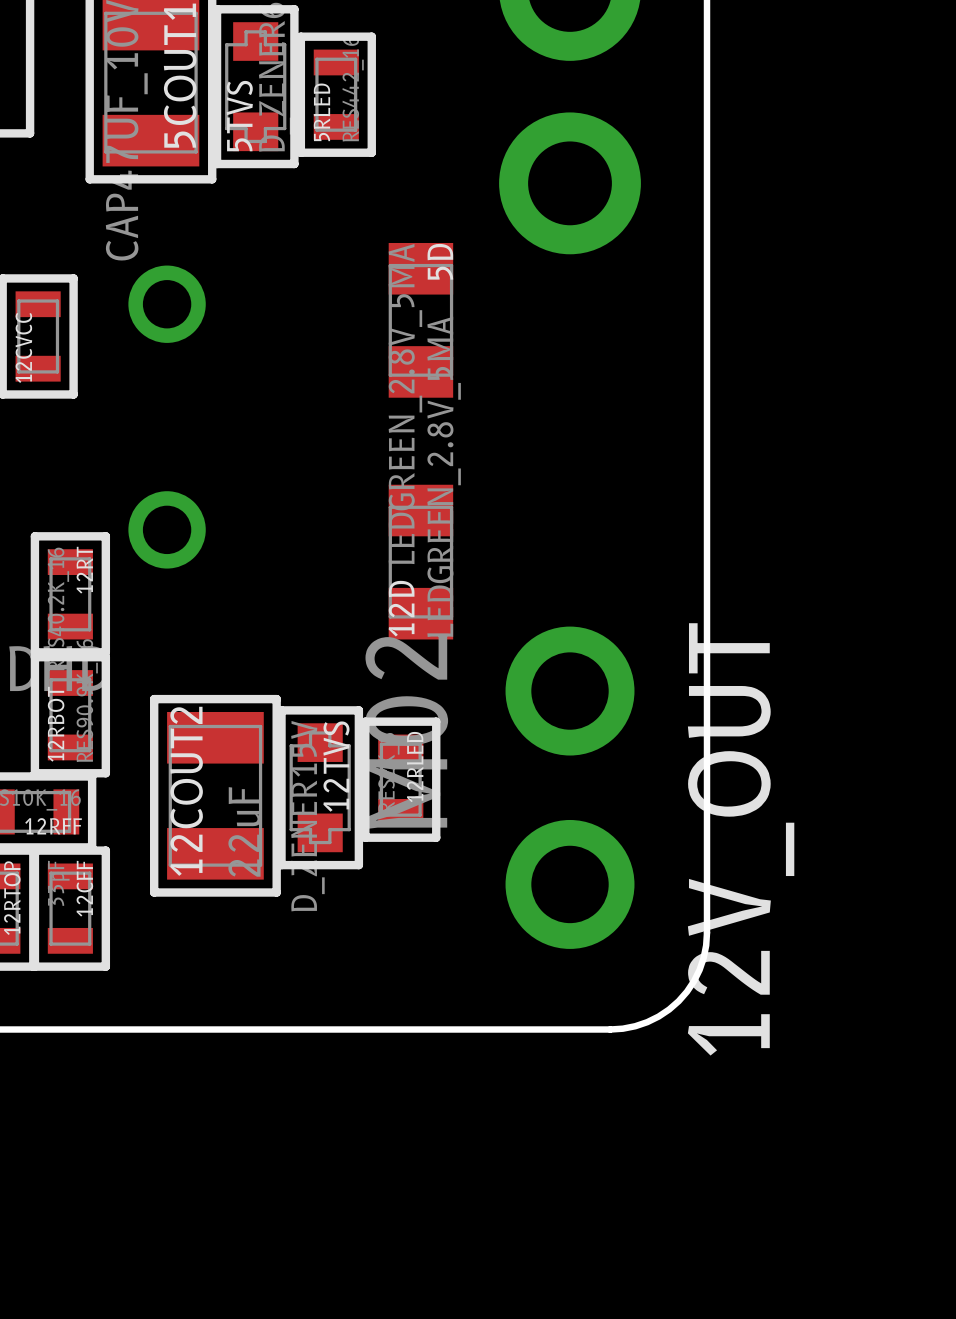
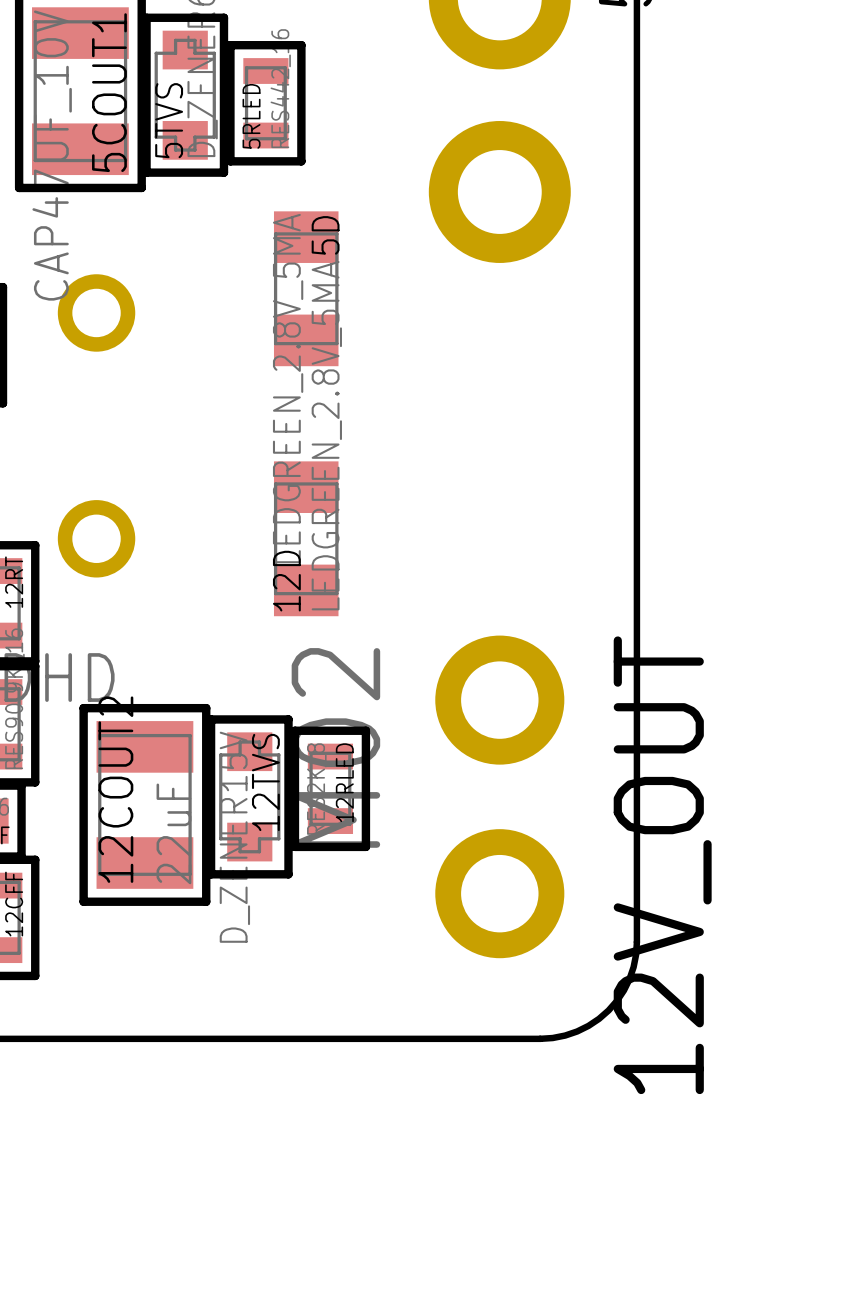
5D position: (420, 320) -> (306, 288)
12D position: (420, 562) -> (306, 538)

